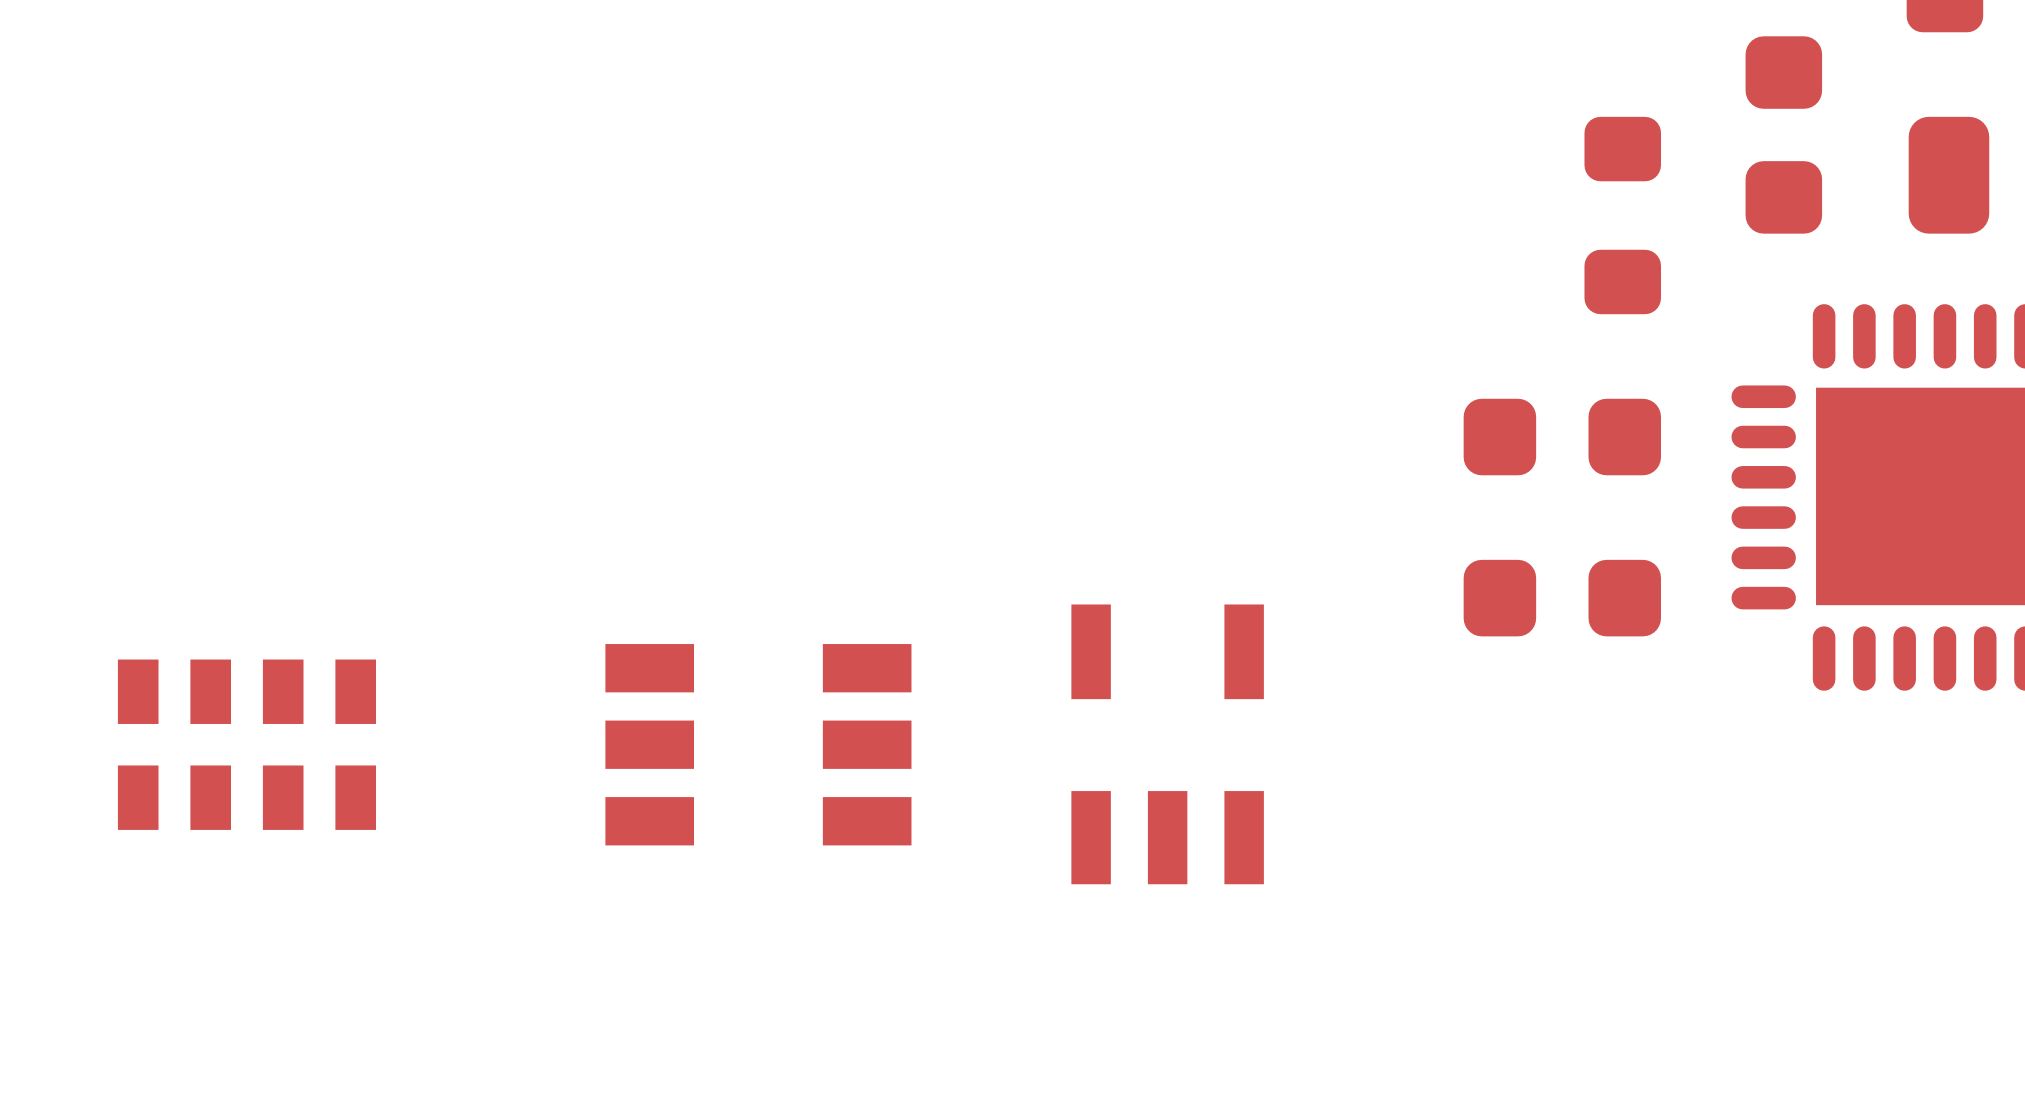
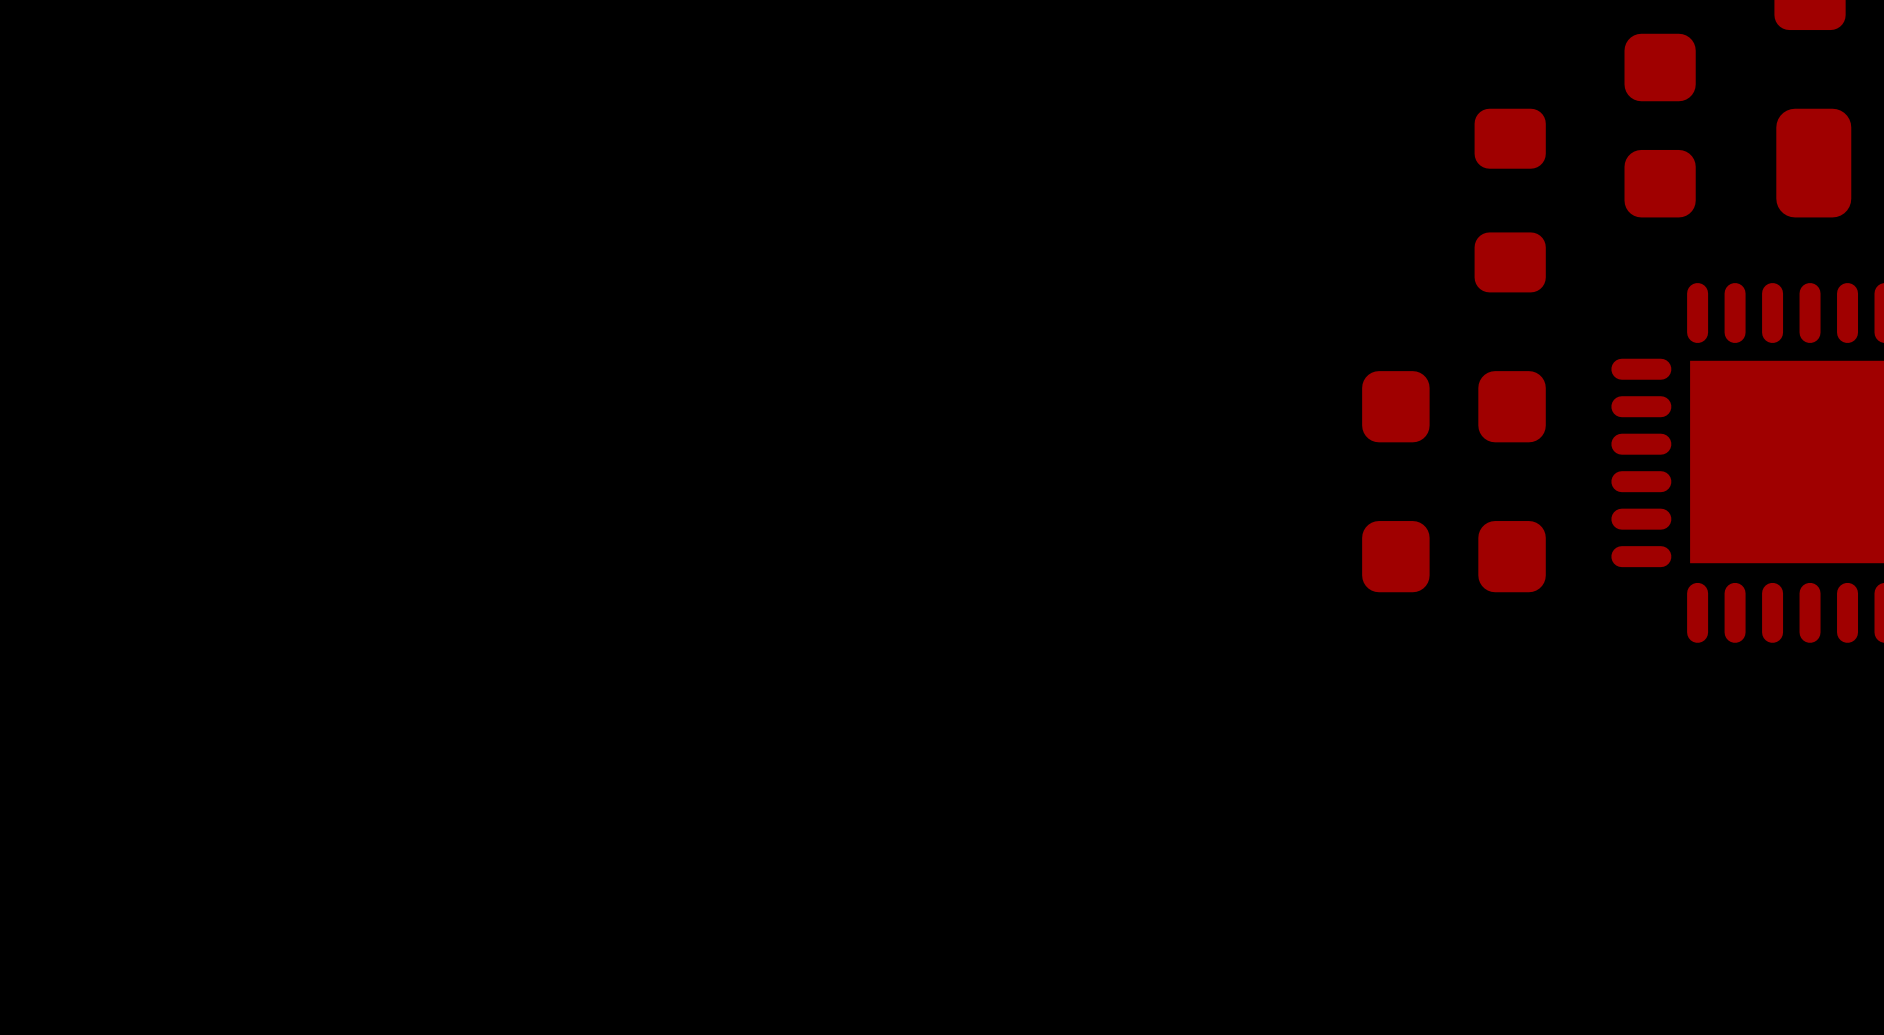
part: (246, 744) -> none
part: (758, 744) -> none
part: (1167, 744) -> none

